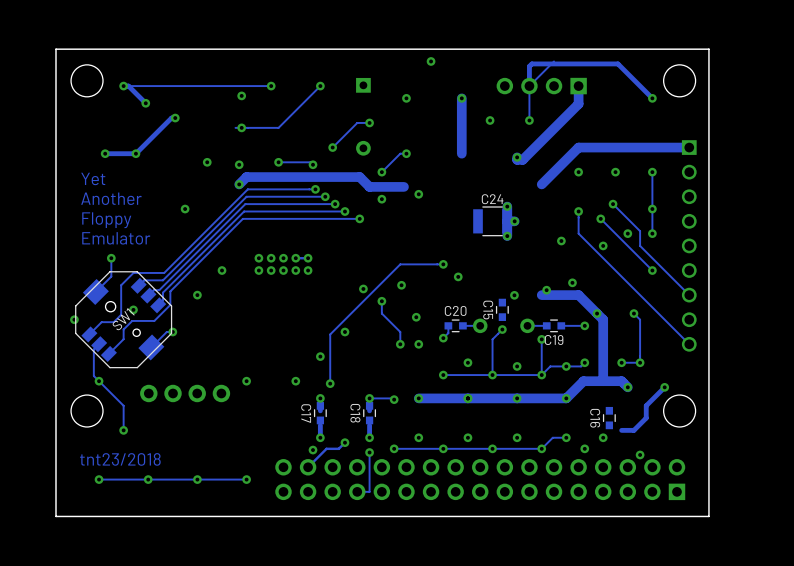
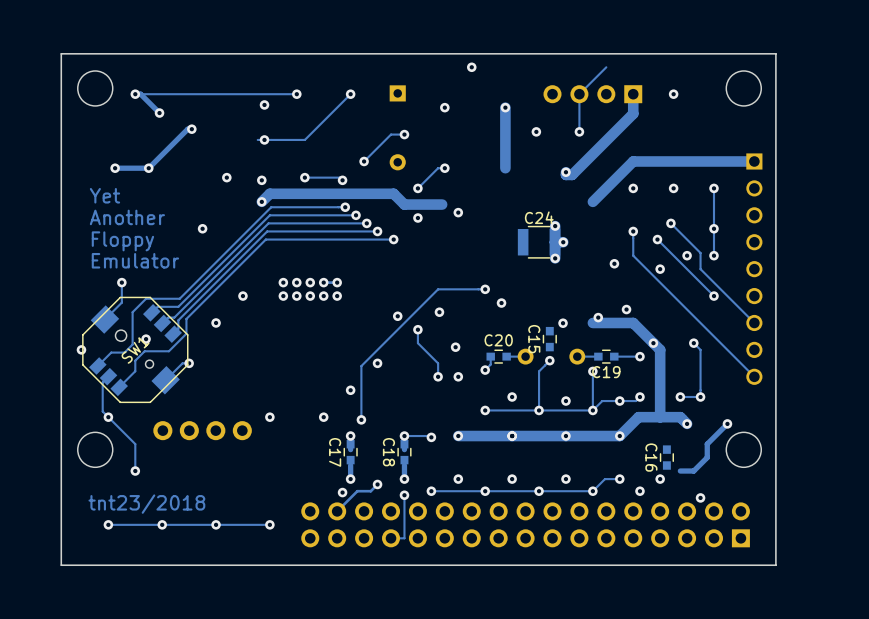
track: (529, 86) (529, 66) (531, 63) (617, 63) (652, 98) -> none
via position: (652, 98) -> (673, 94)

